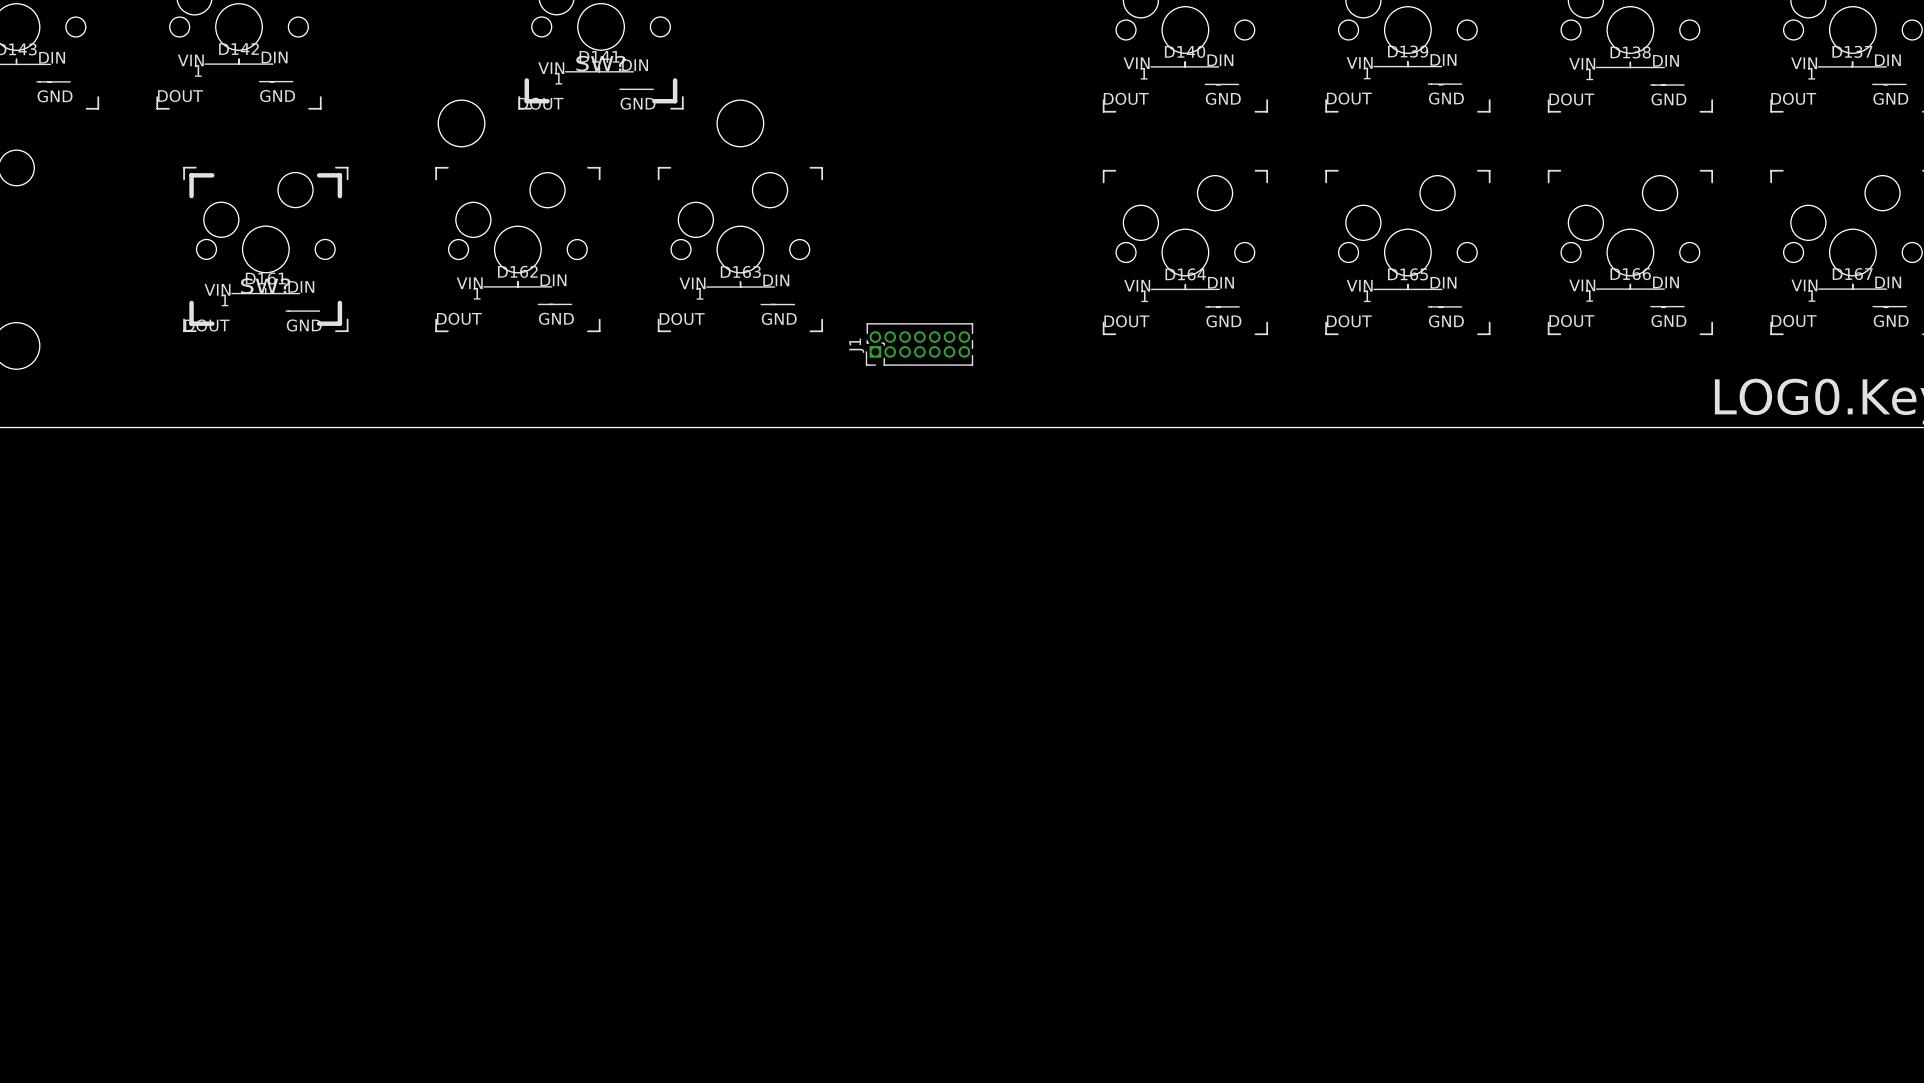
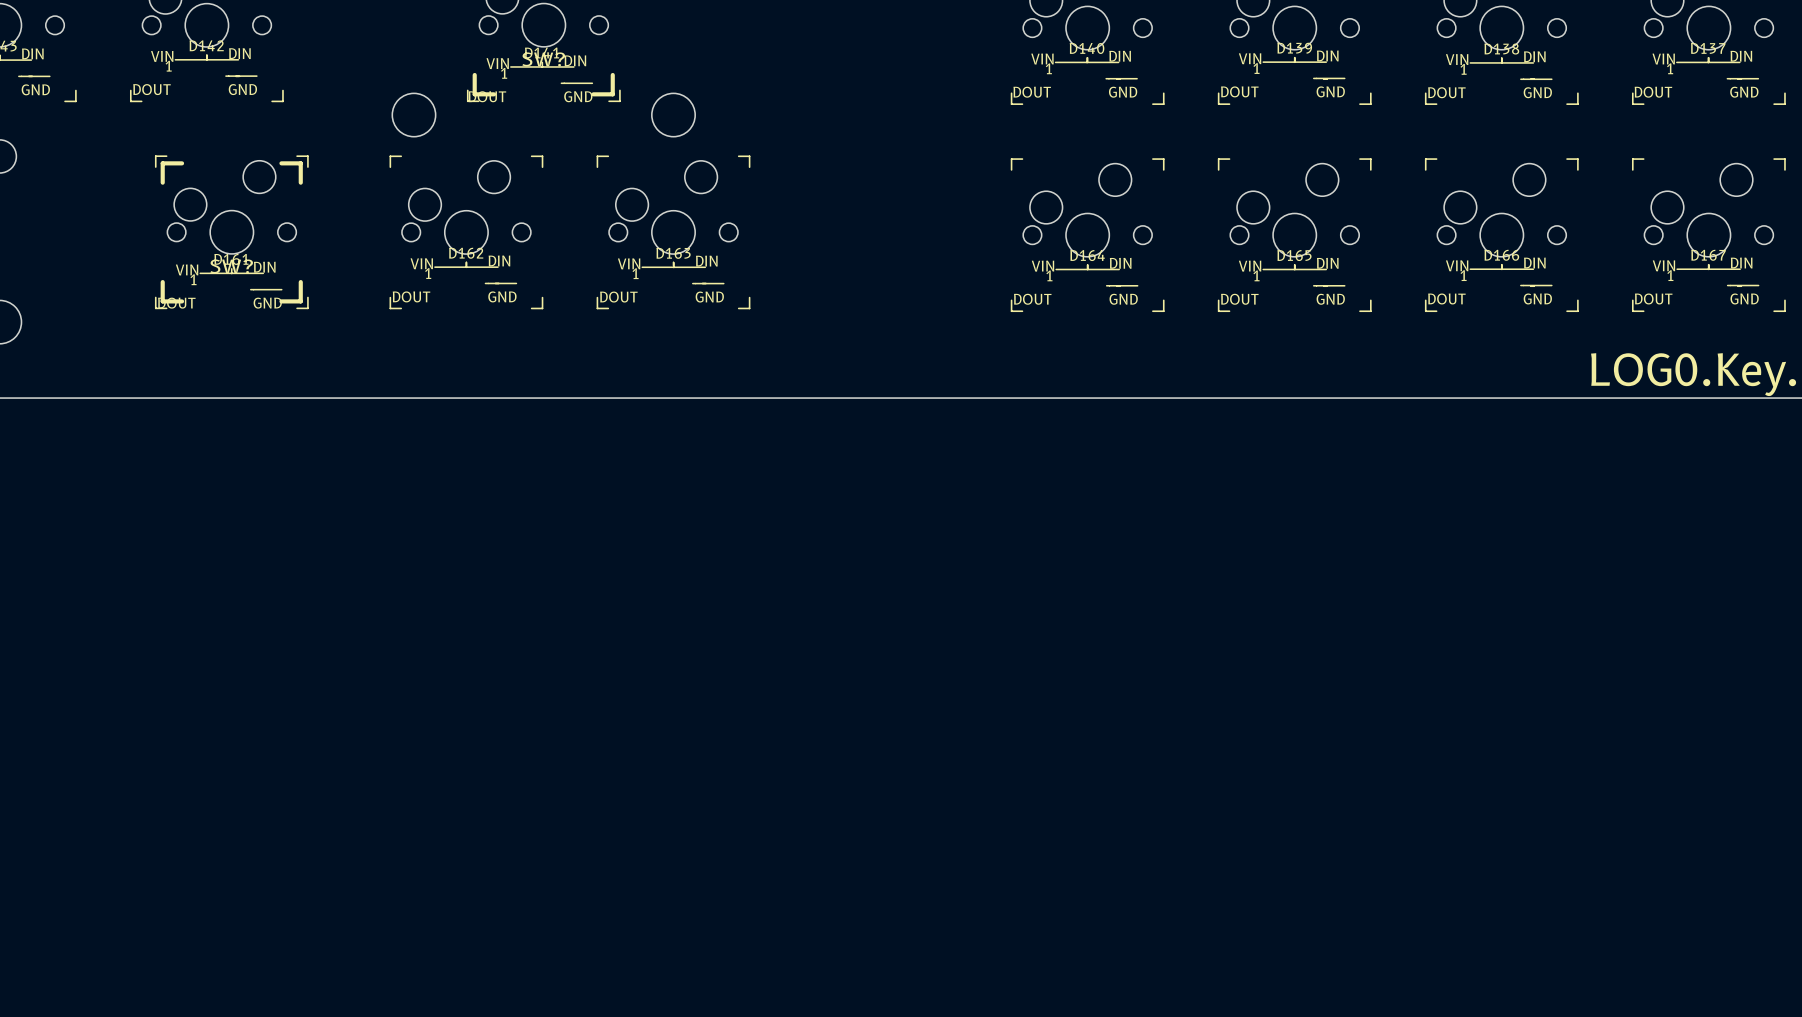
J1: (919, 344) -> none

